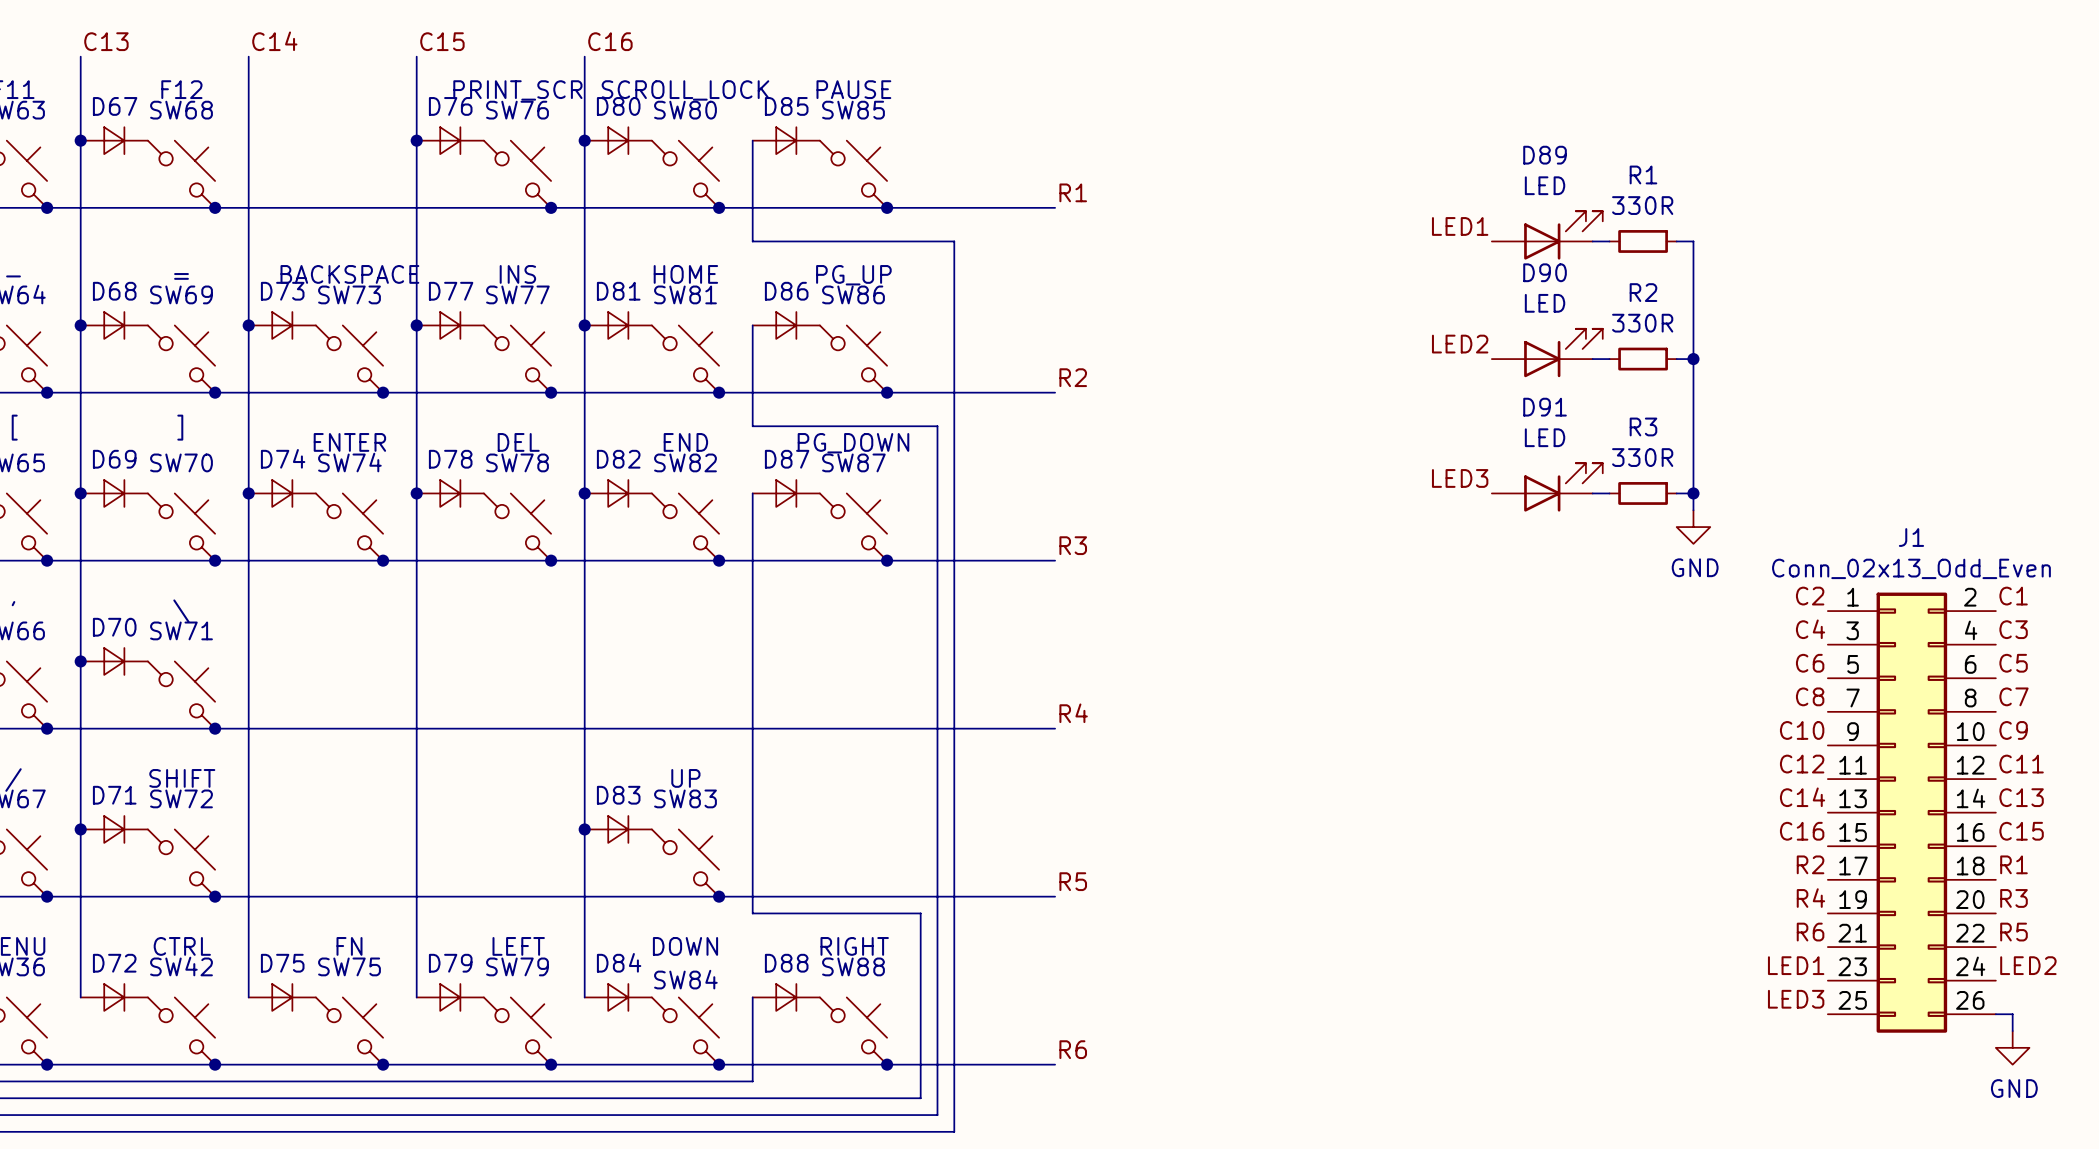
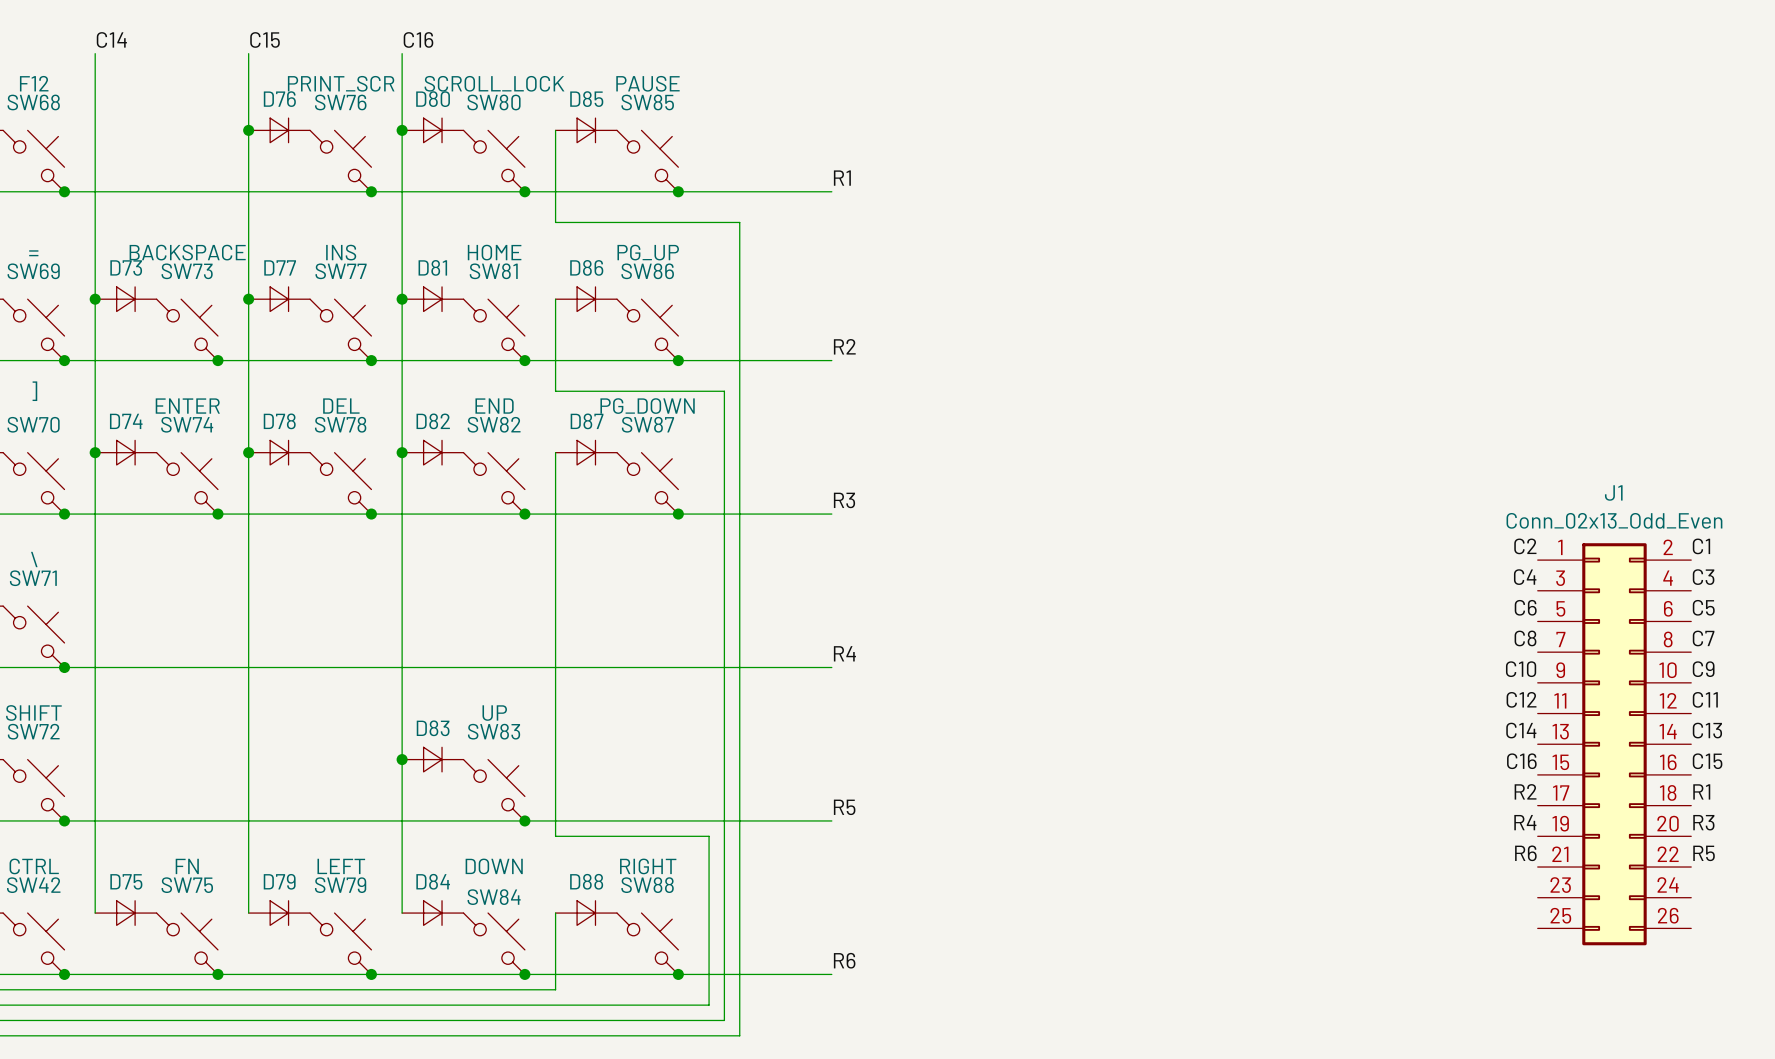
label: LED1 (1460, 226) -> none
D89: LED (1547, 235) -> none
wire: (1592, 241) (1609, 241) -> none
R1: 330R (1643, 241) -> none
wire: (1676, 241) (1693, 241) (1693, 510) -> none
label: LED2 (1460, 344) -> none
D90: LED (1547, 353) -> none
wire: (1592, 359) (1609, 359) -> none
R2: 330R (1643, 359) -> none
wire: (1676, 359) (1693, 359) -> none
junction: (1693, 359) -> none
label: LED3 (1460, 478) -> none
D91: LED (1547, 487) -> none
wire: (1592, 493) (1609, 493) -> none
R3: 330R (1643, 493) -> none
wire: (1676, 493) (1693, 493) -> none
junction: (1693, 493) -> none
power symbol: GND (1693, 527) -> none
label: LED1 (1796, 965) -> none
label: LED2 (2028, 965) -> none
label: LED3 (1796, 999) -> none
wire: (1995, 1014) (2012, 1014) (2012, 1031) -> none
power symbol: GND (2012, 1047) -> none

